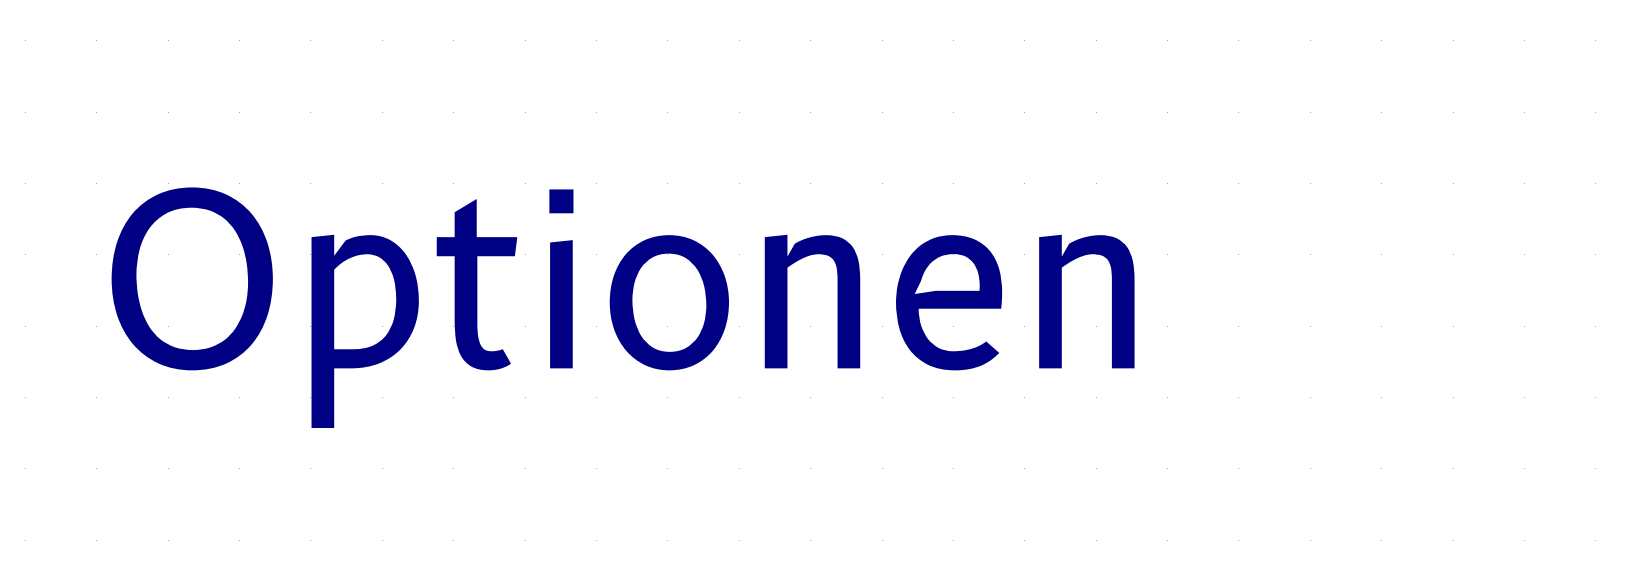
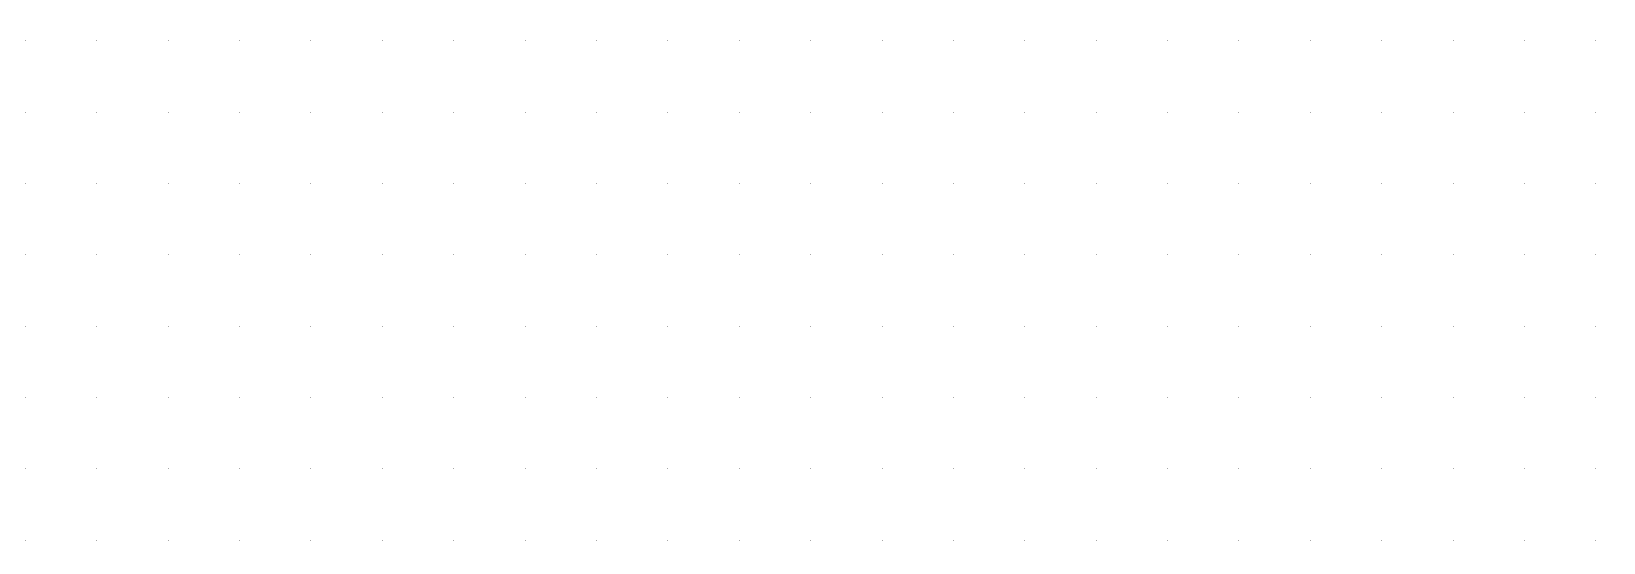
text: Optionen (623, 307) -> none

